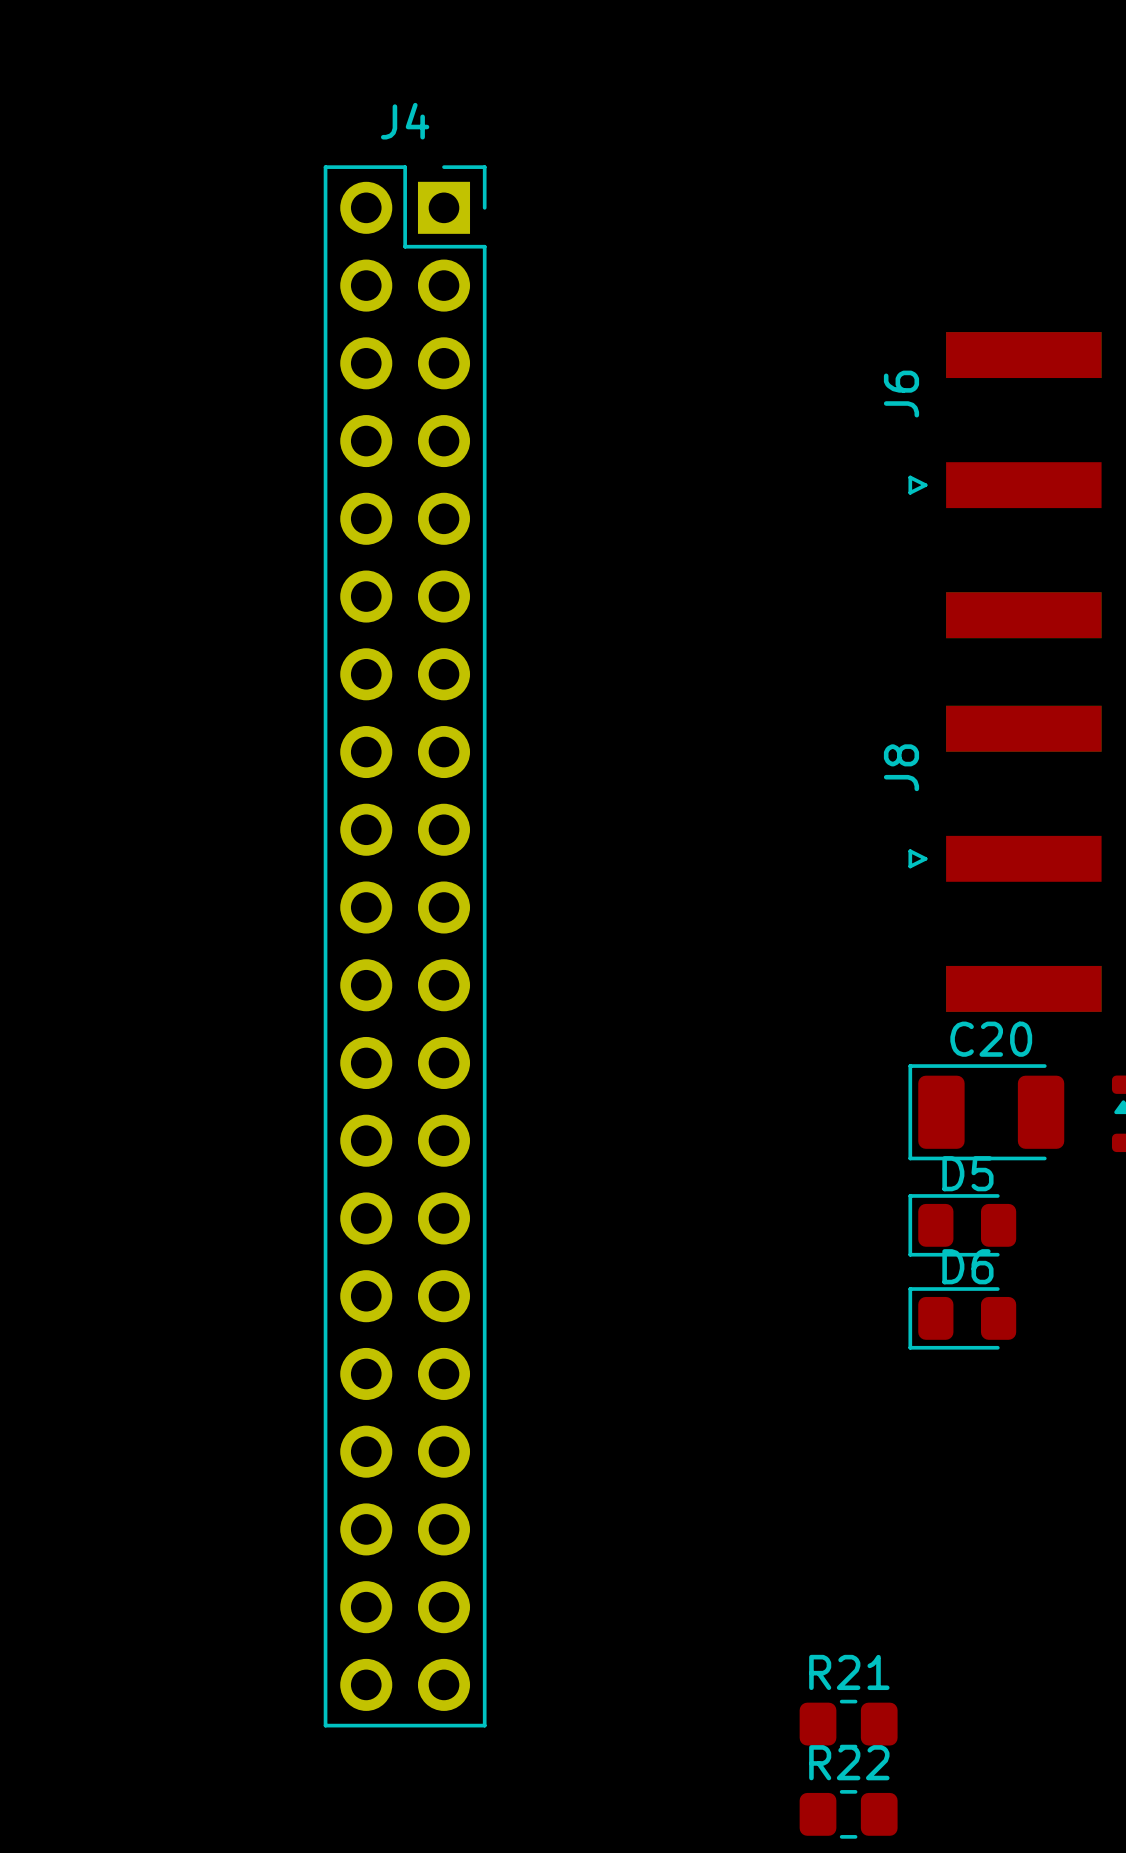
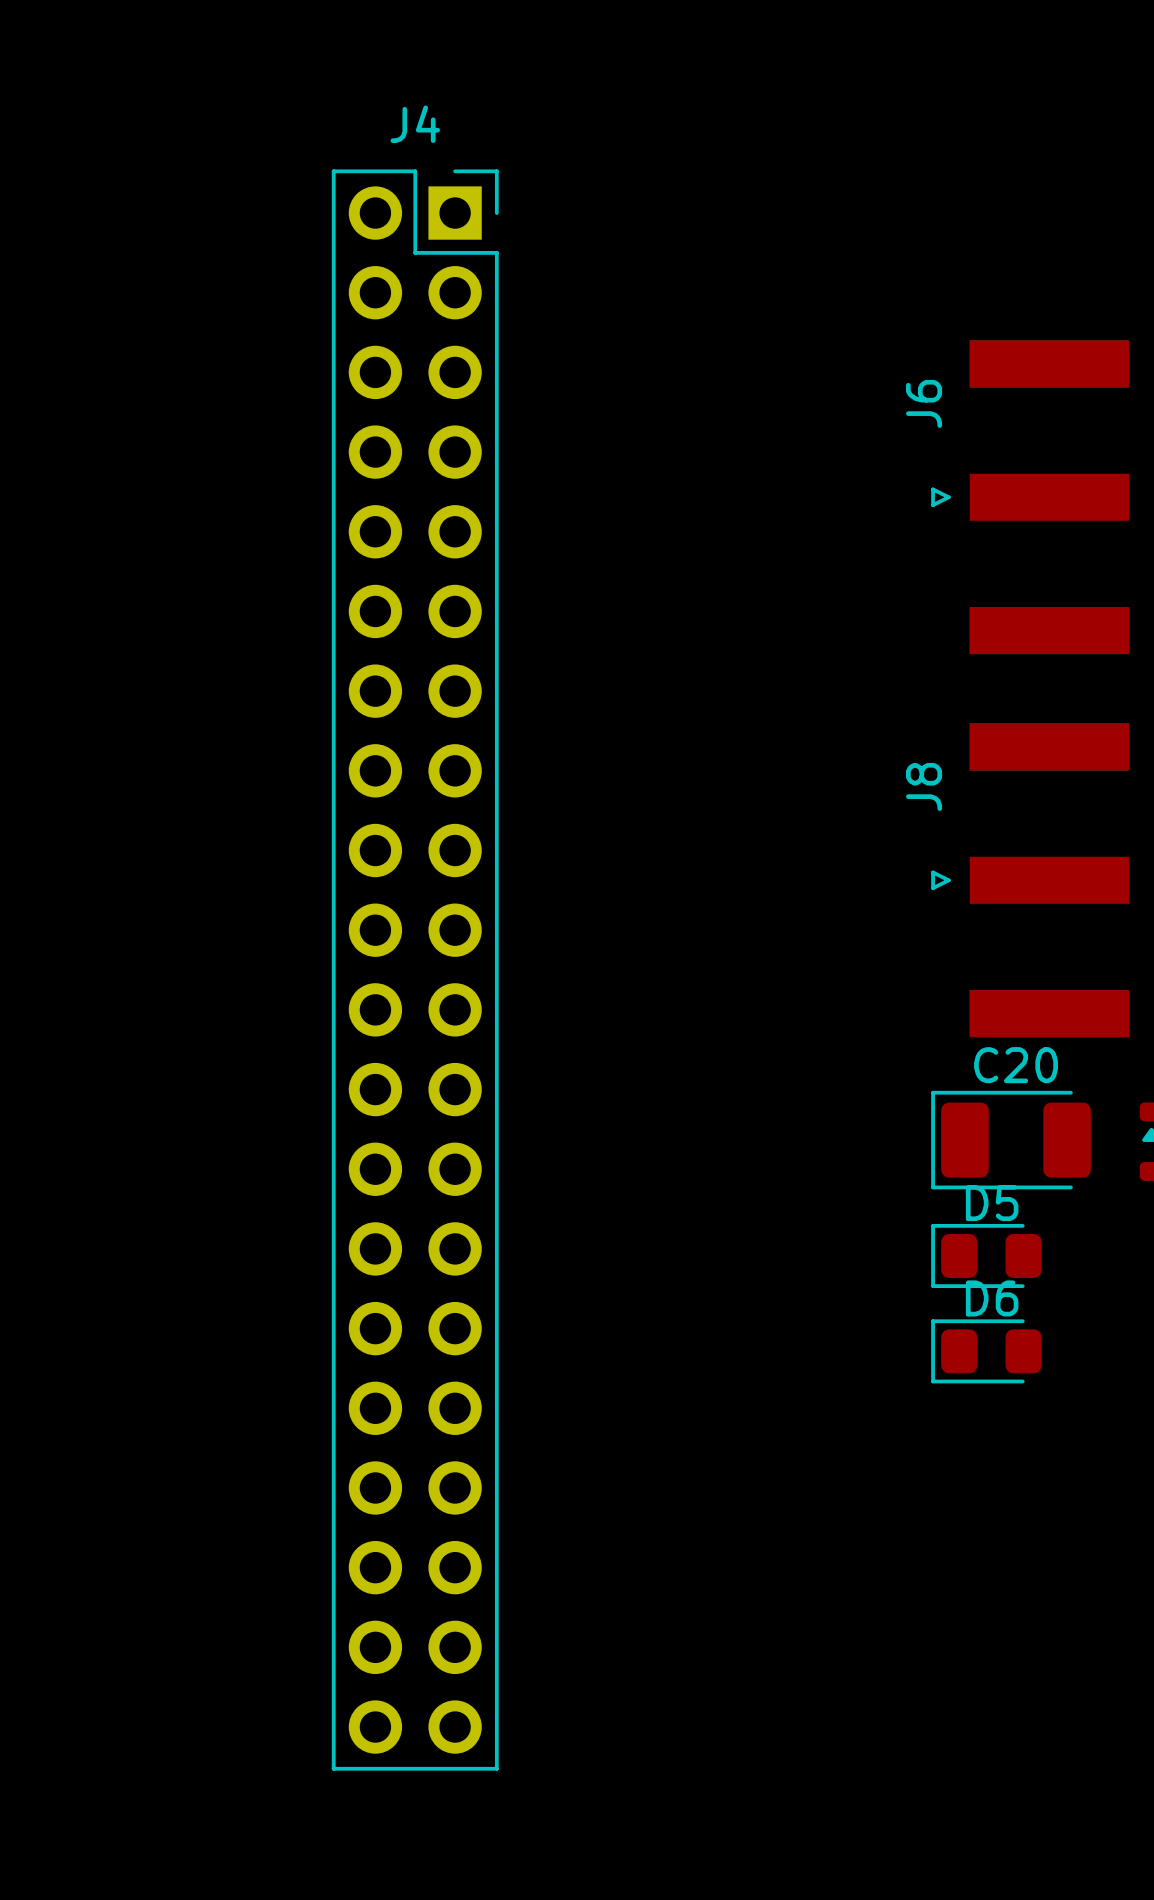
R21: (848, 1724) -> none
R22: (848, 1814) -> none

